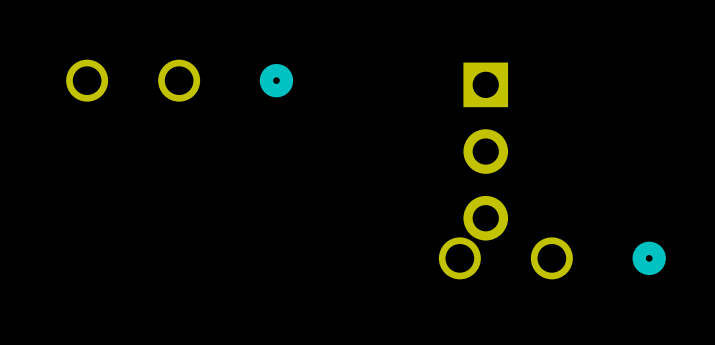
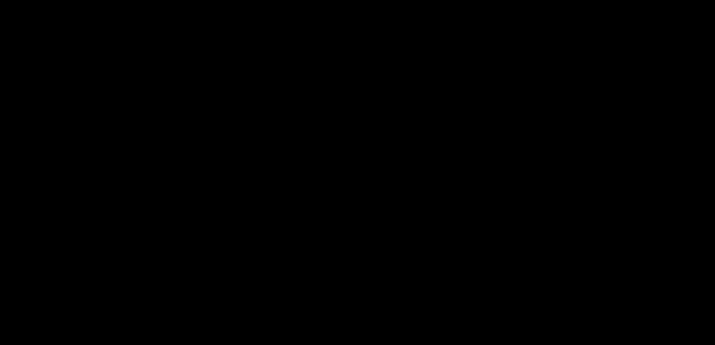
part: (179, 80) -> none
part: (485, 151) -> none
part: (552, 258) -> none

